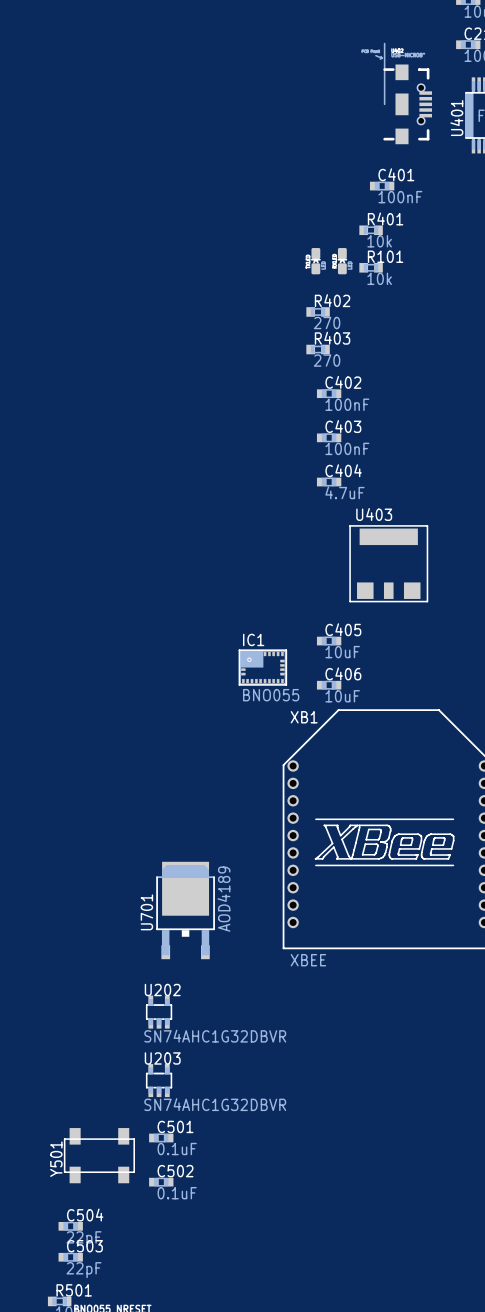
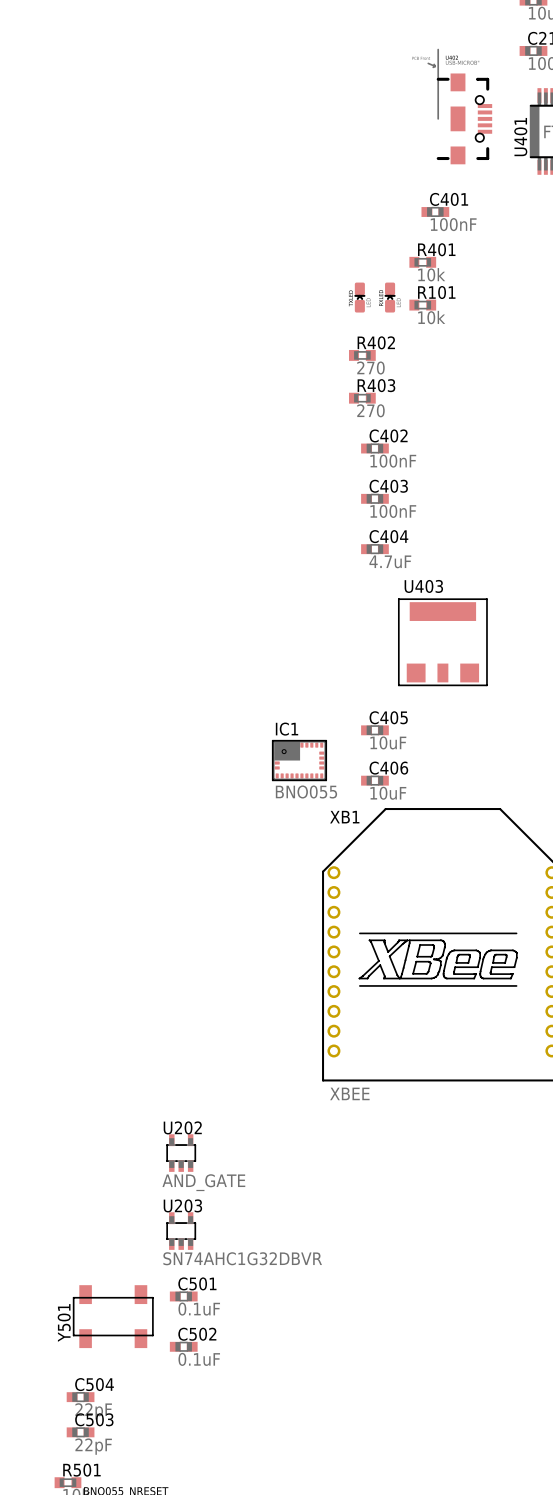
U701: AOD4189 (185, 910) -> none
U202 value: SN74AHC1G32DBVR (215, 1036) -> AND_GATE (203, 1182)

